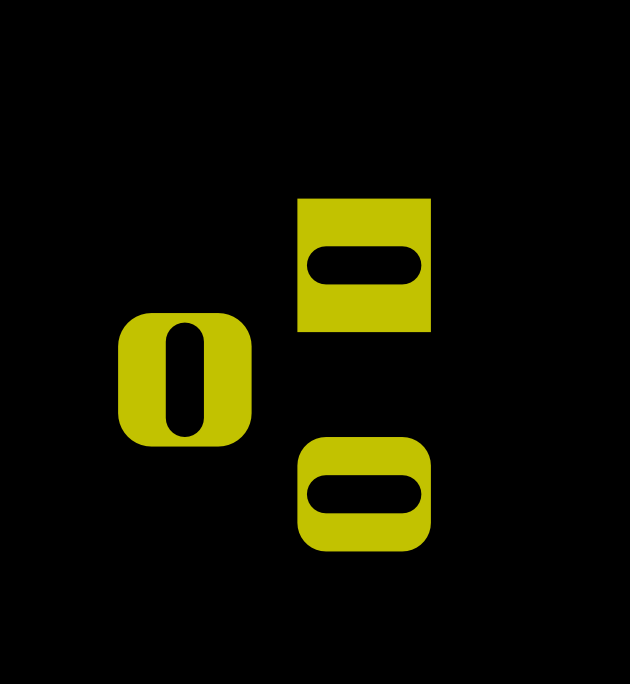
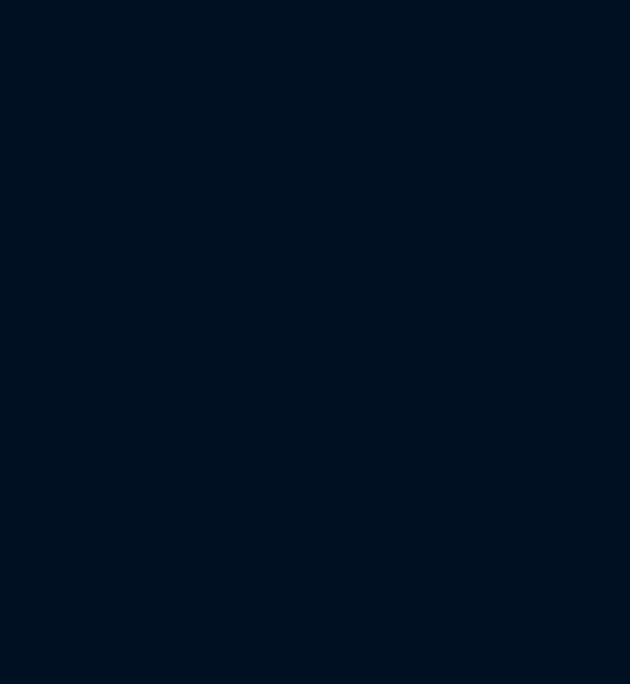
part: (274, 375) -> none

